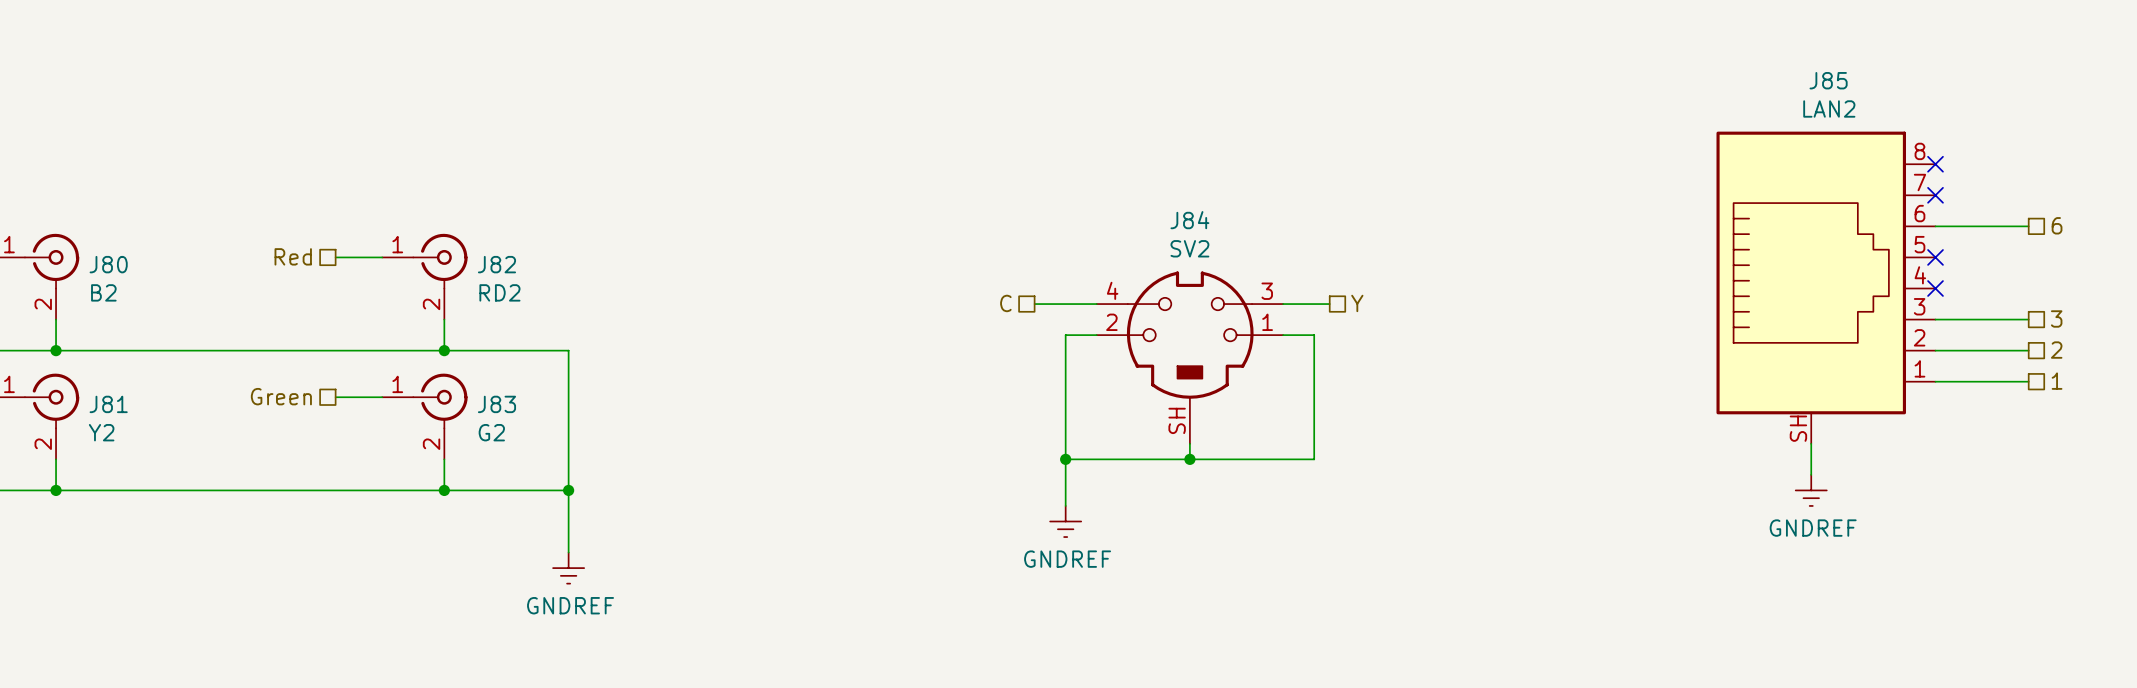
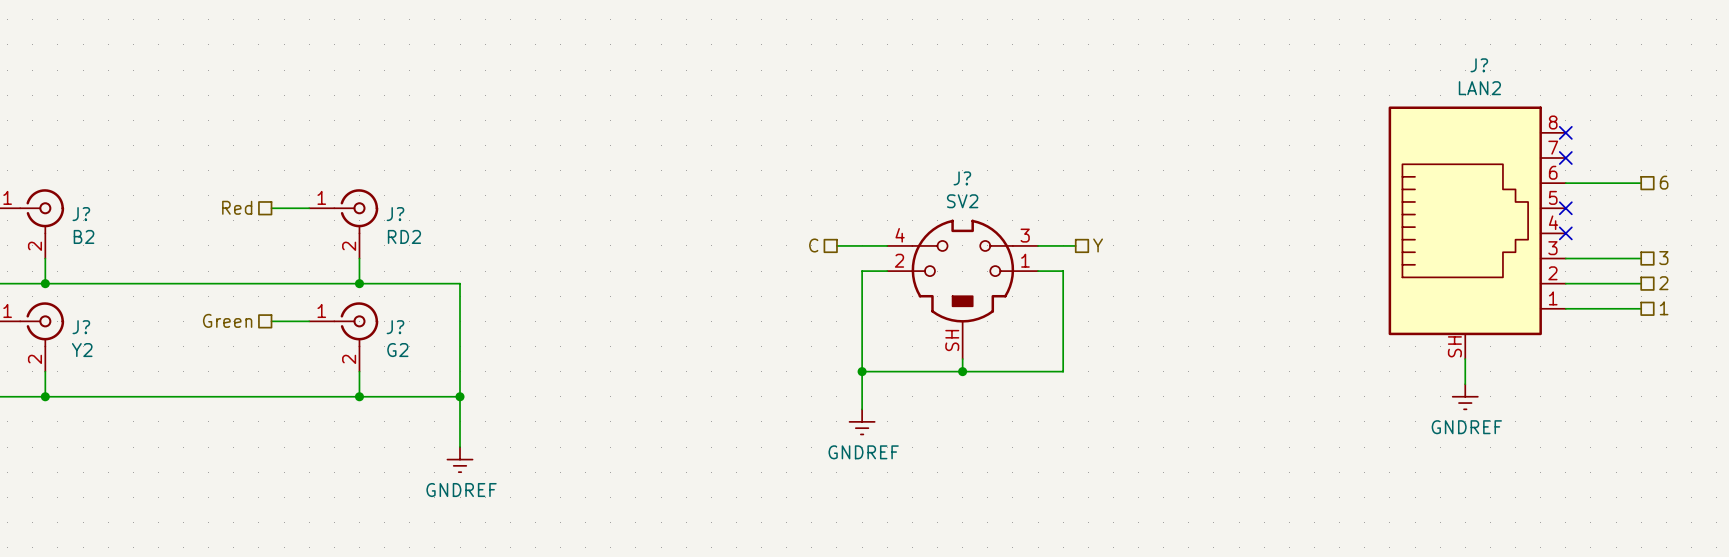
J85 name: J85 (1828, 80) -> J? (1479, 65)
J84 name: J84 (1189, 220) -> J? (962, 178)
J80 name: J80 (108, 264) -> J? (81, 214)
J82 name: J82 (496, 264) -> J? (395, 214)
J81 name: J81 (108, 404) -> J? (81, 327)
J83 name: J83 (496, 404) -> J? (395, 327)

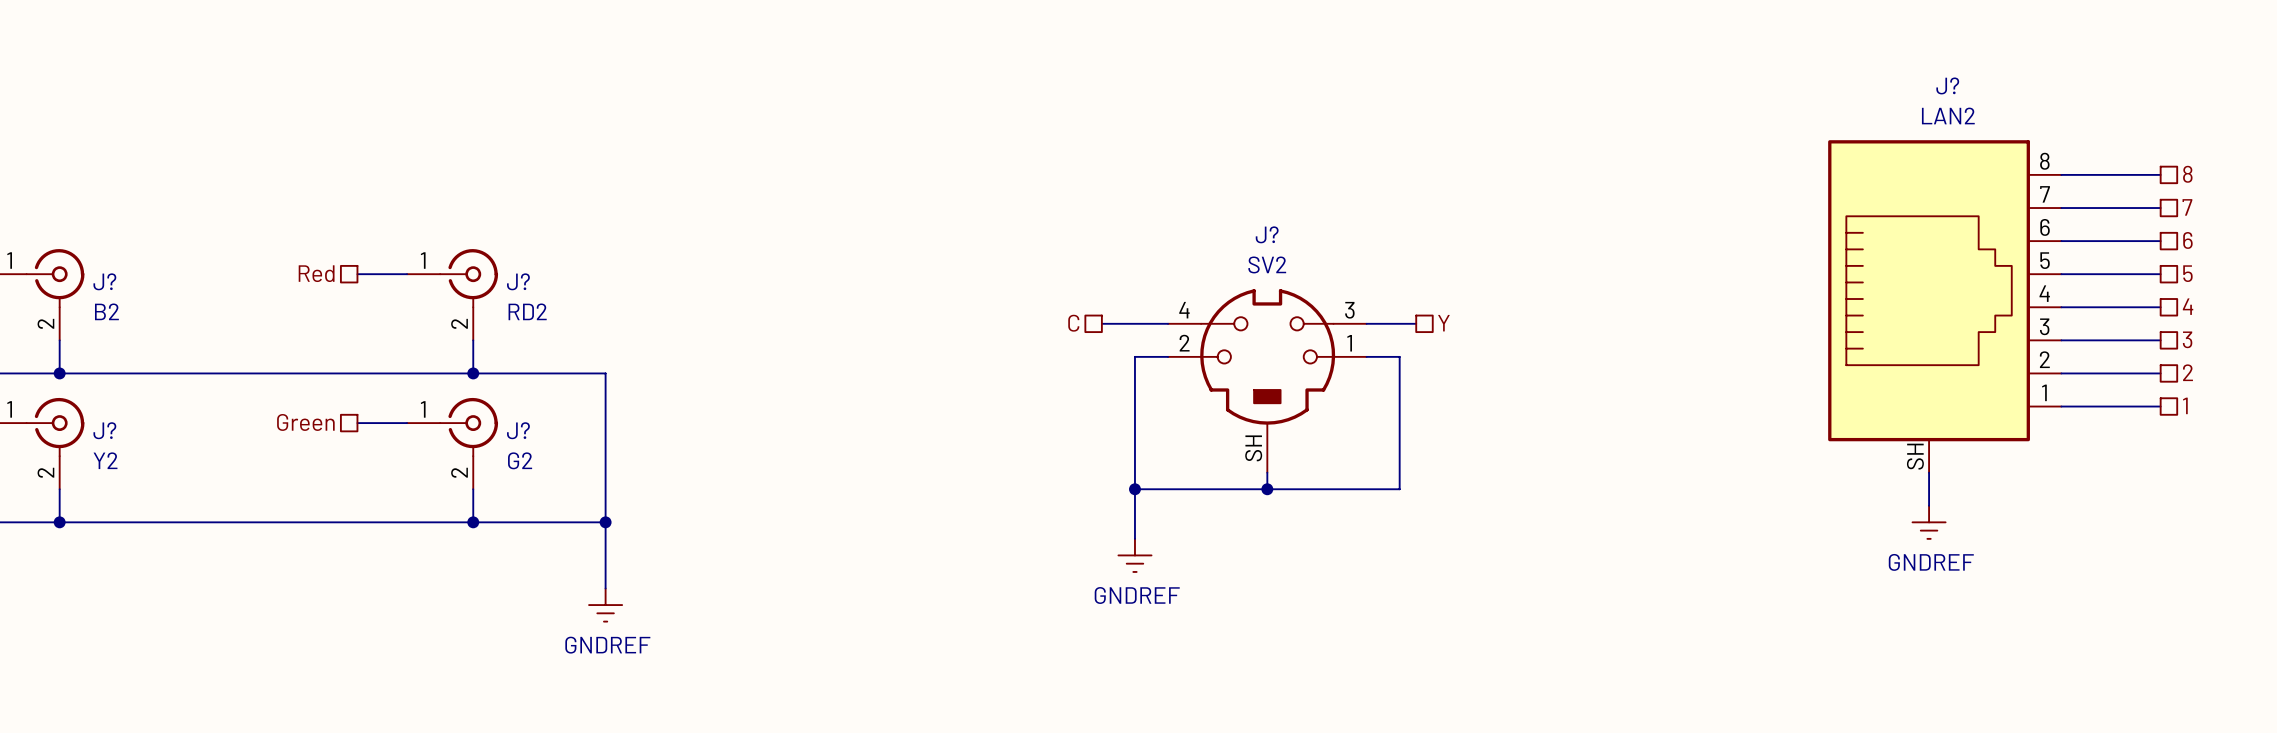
wire: none -> (2061, 174) (2160, 174)
no-connect mark: (1565, 132) -> none
hierarchical label: none -> 8 (2187, 174)
hierarchical label: none -> 7 (2187, 207)
wire: none -> (2061, 208) (2160, 208)
no-connect mark: (1565, 158) -> none
hierarchical label: none -> 5 (2187, 273)
wire: none -> (2061, 274) (2160, 274)
no-connect mark: (1565, 208) -> none
hierarchical label: none -> 4 (2188, 306)
wire: none -> (2061, 307) (2160, 307)
no-connect mark: (1565, 233) -> none

